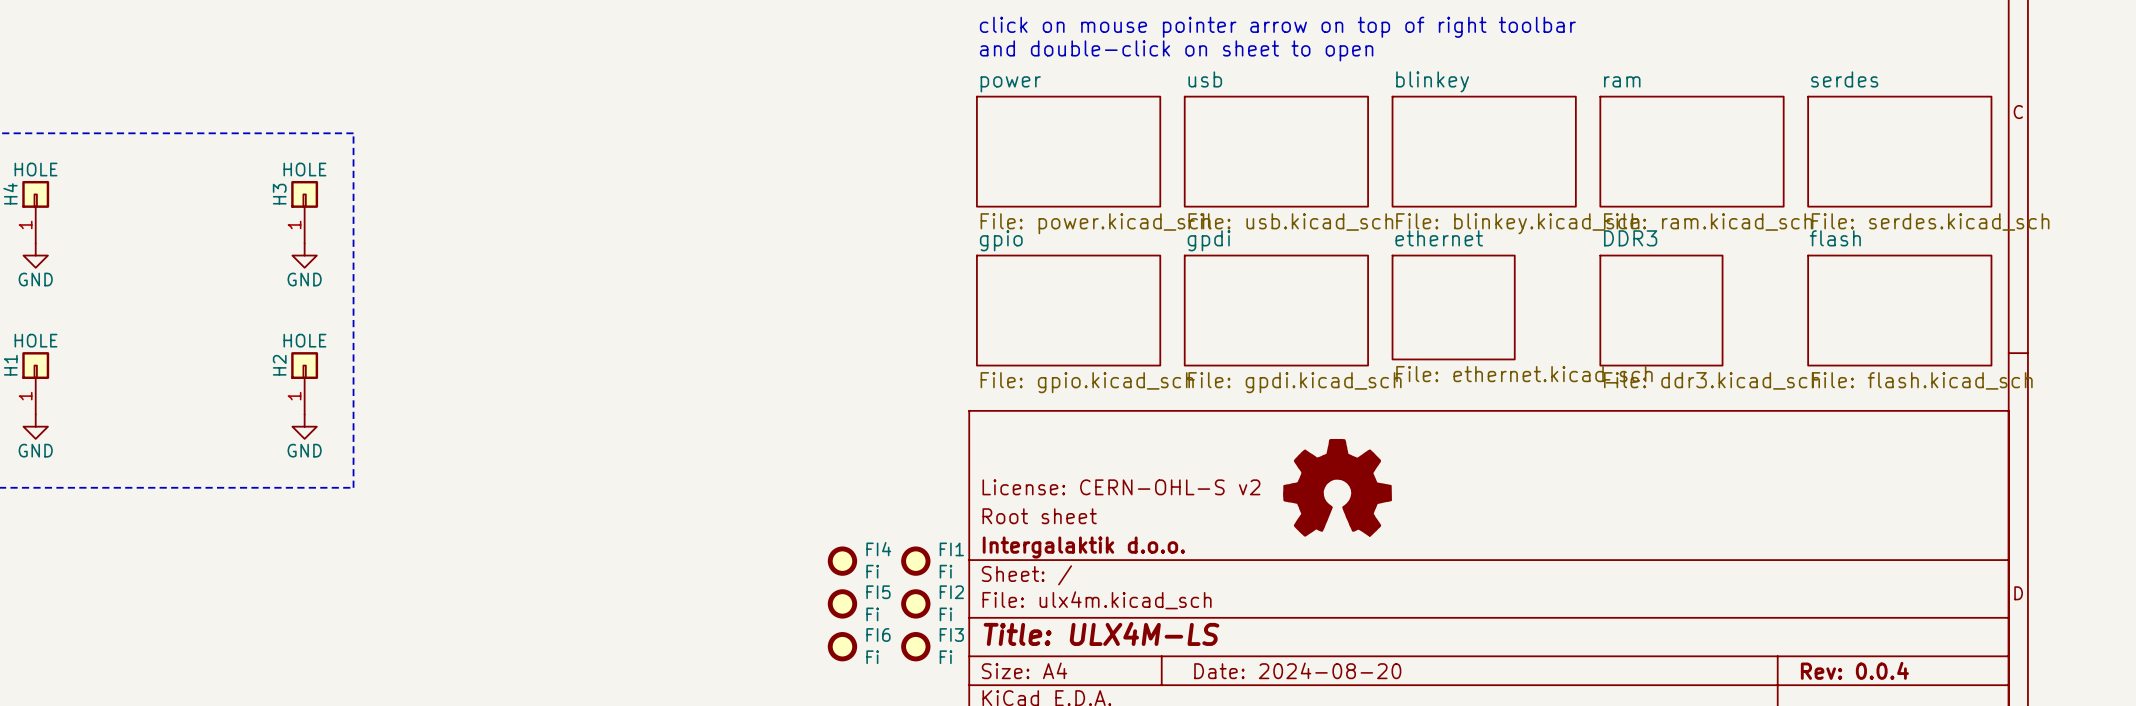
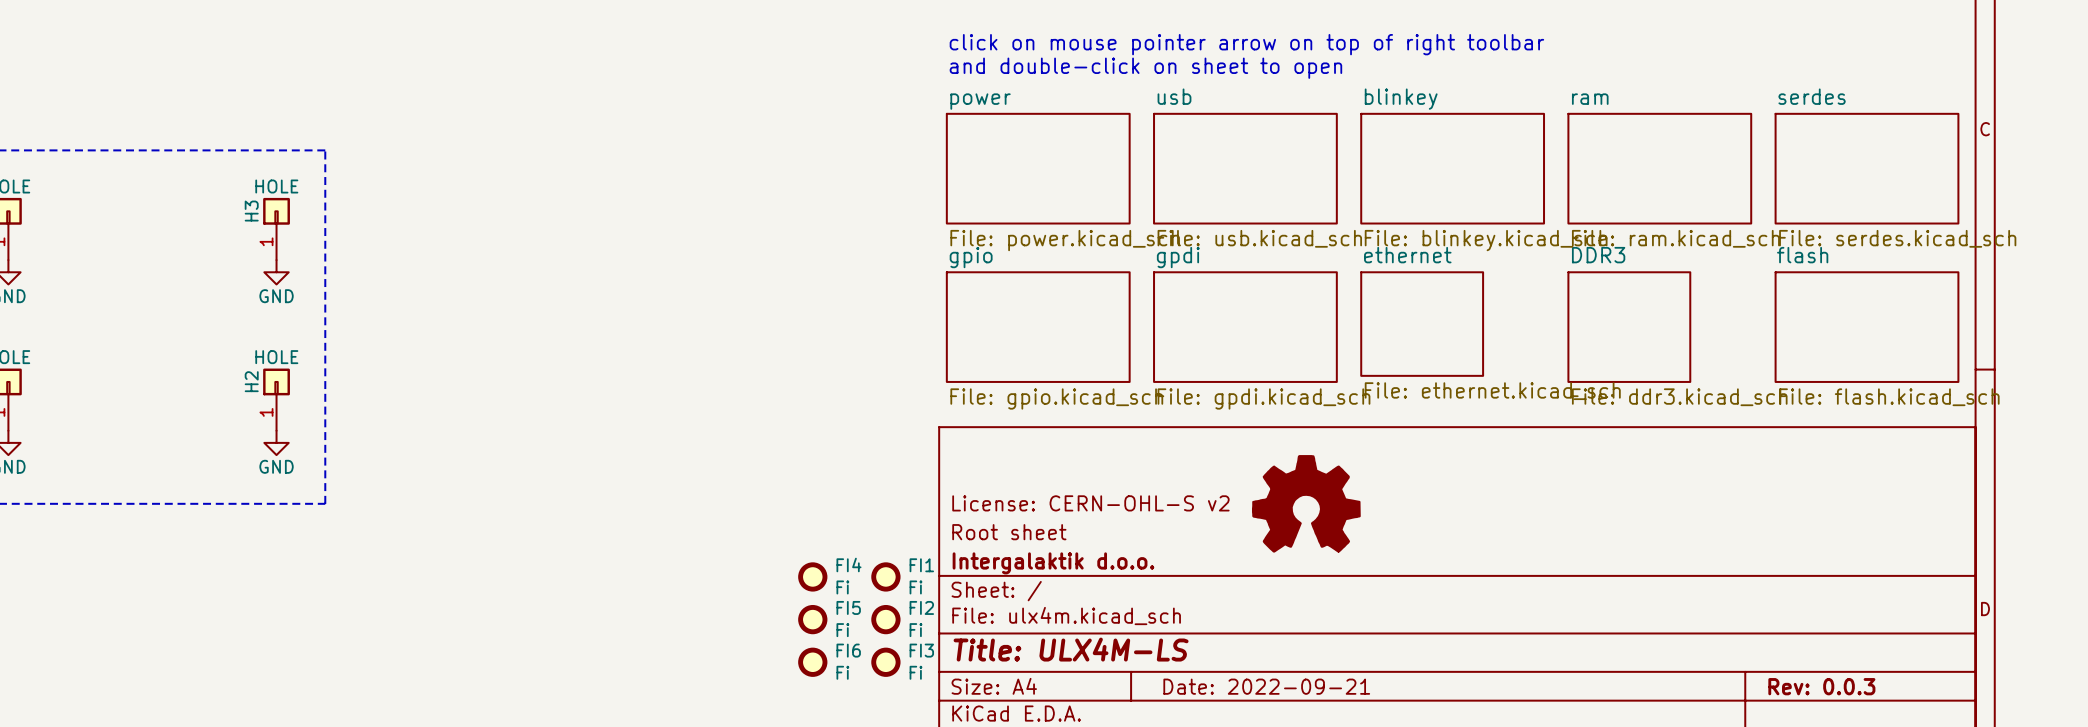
title block: Date: 2024-08-20 (1297, 670) -> Date: 2022-09-21 (1266, 686)
title block: Rev: 0.0.4 (1854, 670) -> Rev: 0.0.3 (1821, 686)

